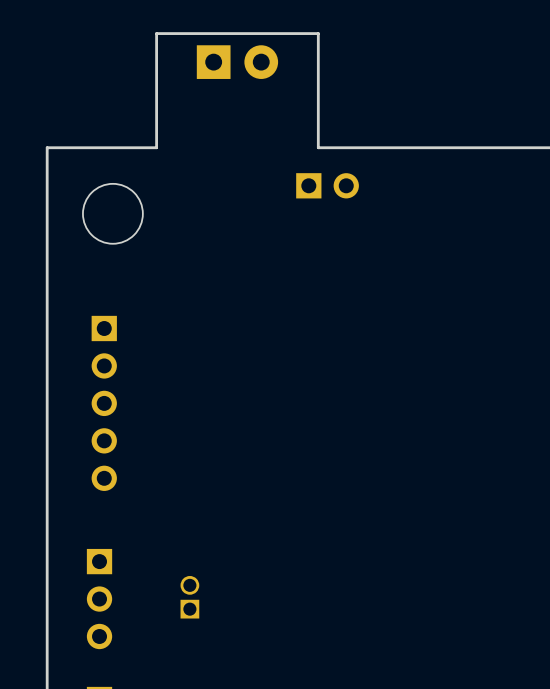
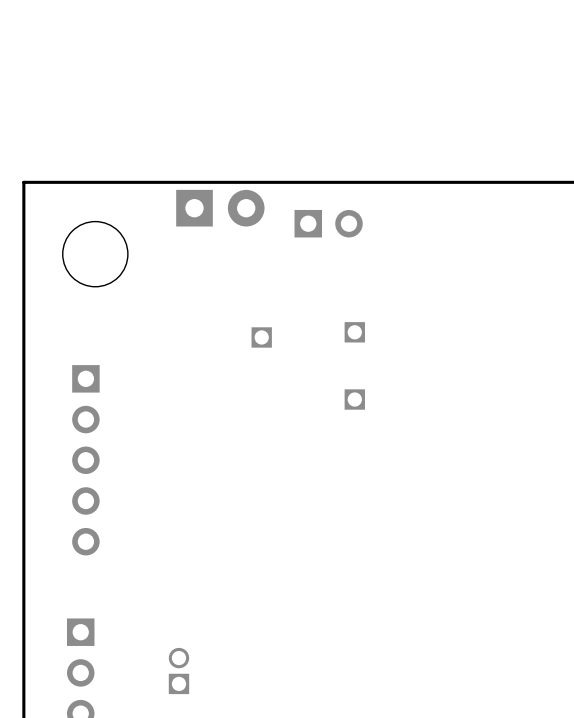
part position: (237, 62) -> (220, 208)
board edge: (318, 147) (318, 33) (156, 33) (156, 147) -> (318, 182) (142, 182)
part: none -> (354, 332)
part: none -> (261, 337)
part: none -> (354, 399)

